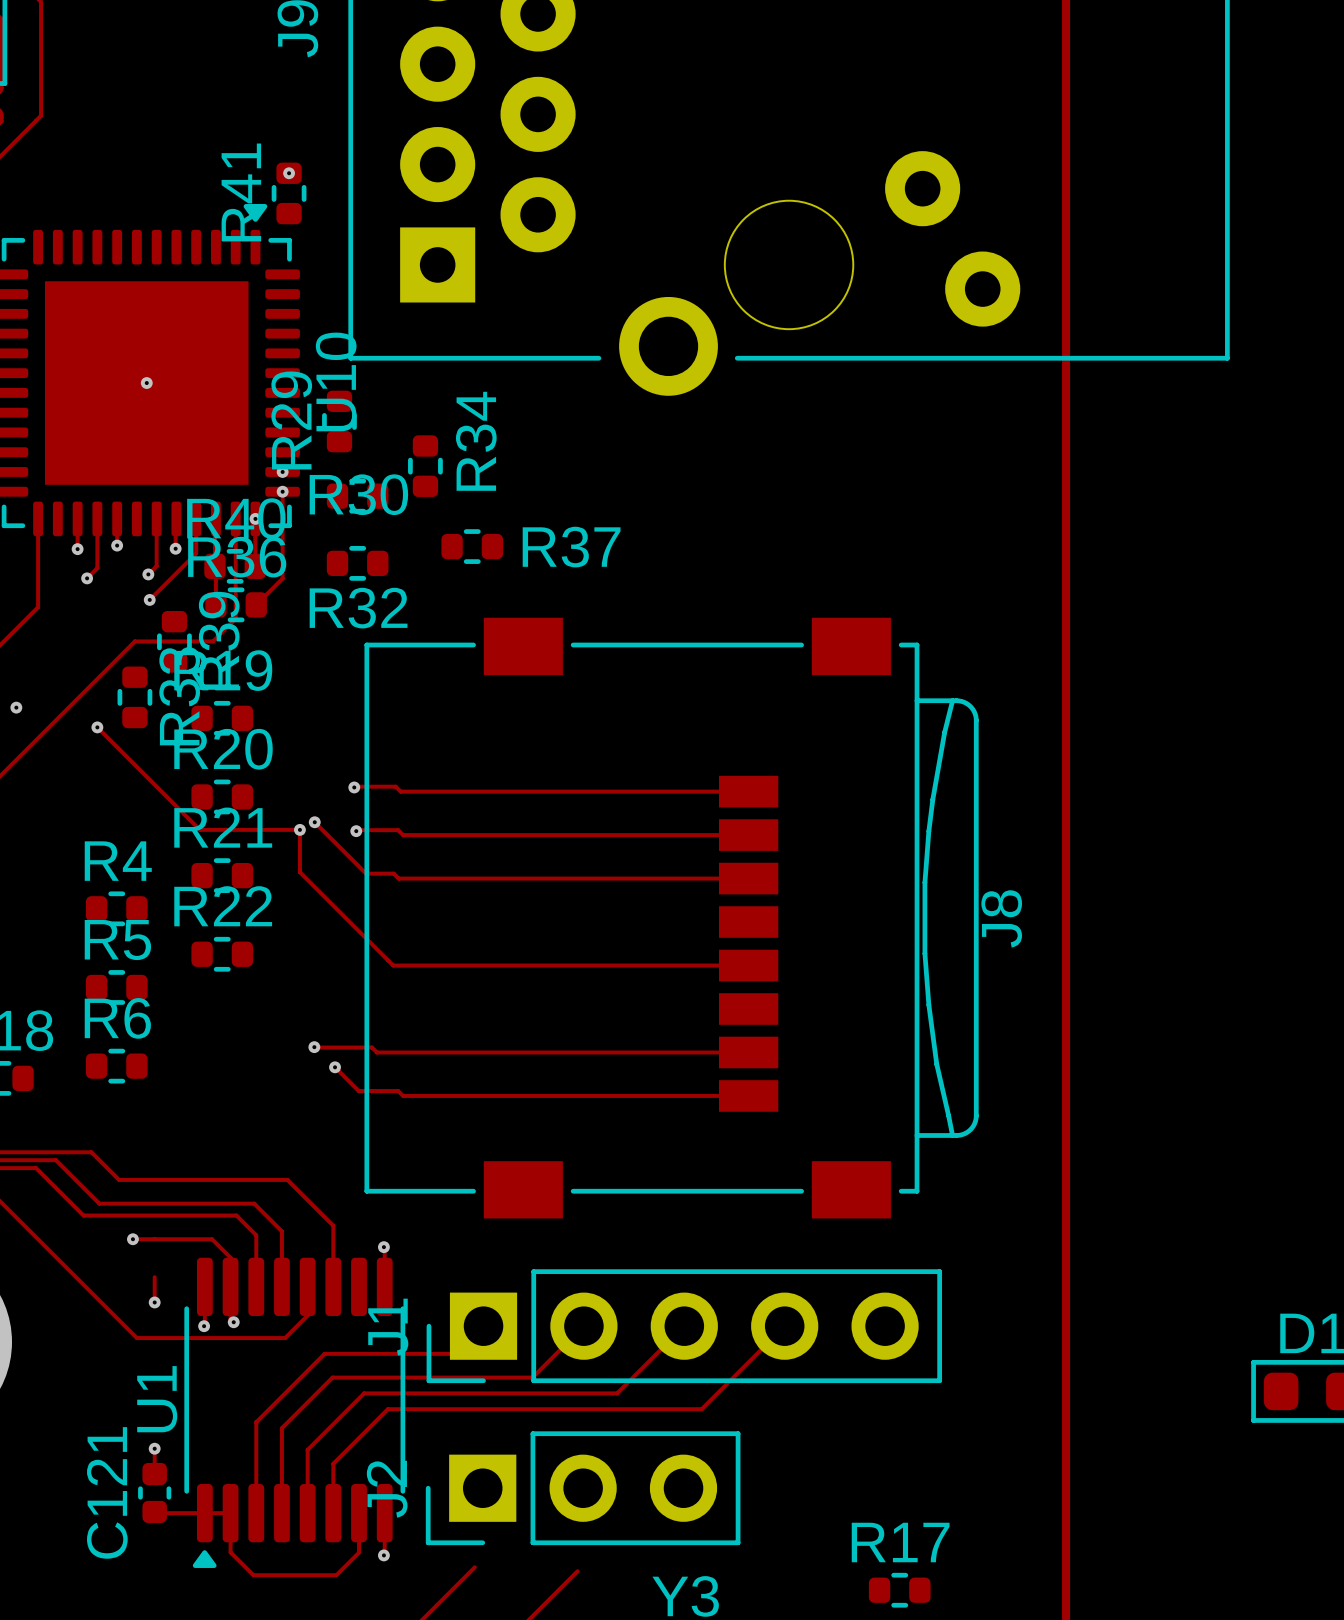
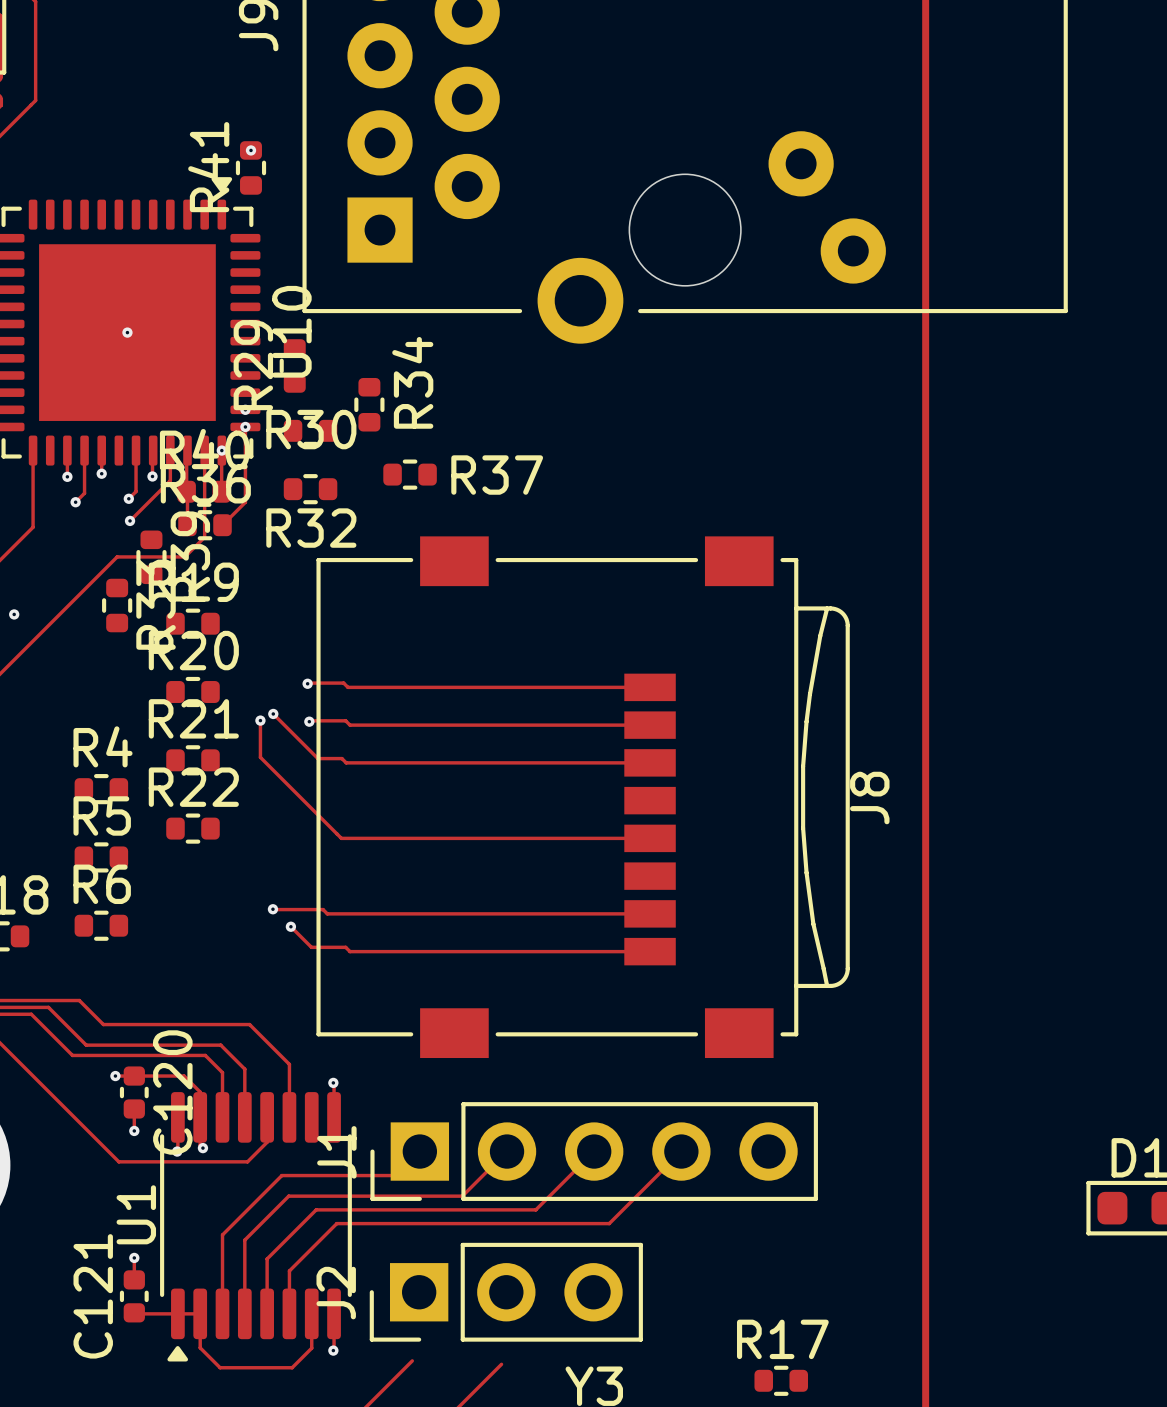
track: (97, 727) (199, 829) (299, 829) -> none
via: (97, 727) -> none
C120: none -> (134, 1092)

